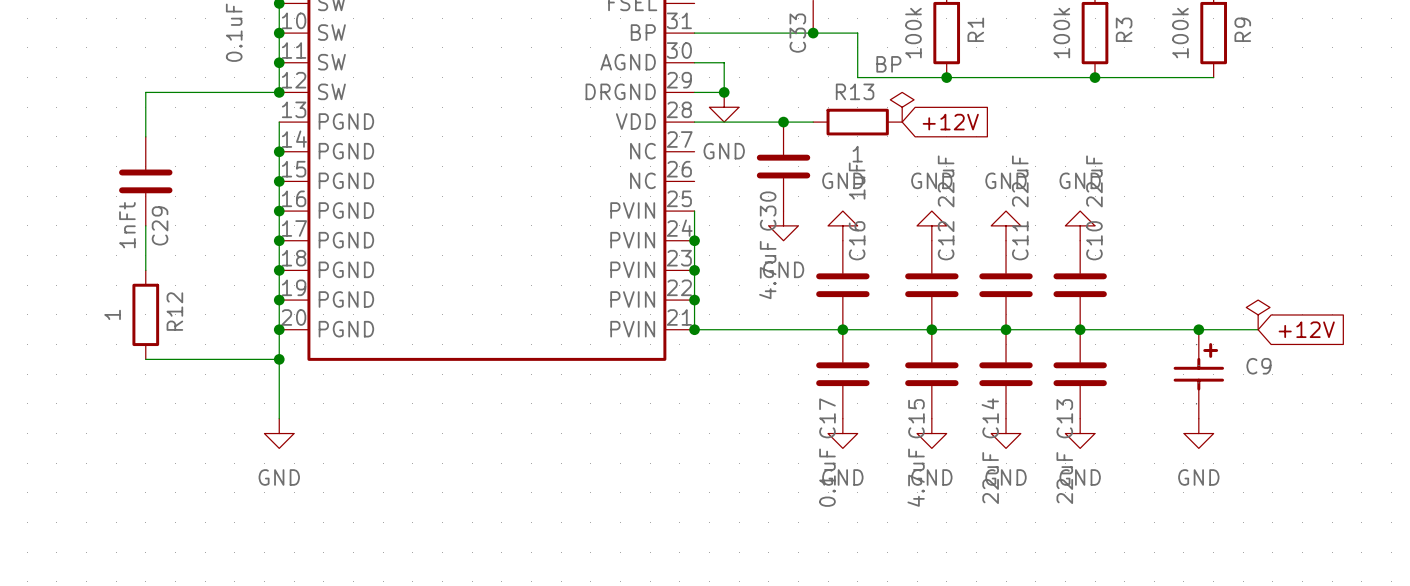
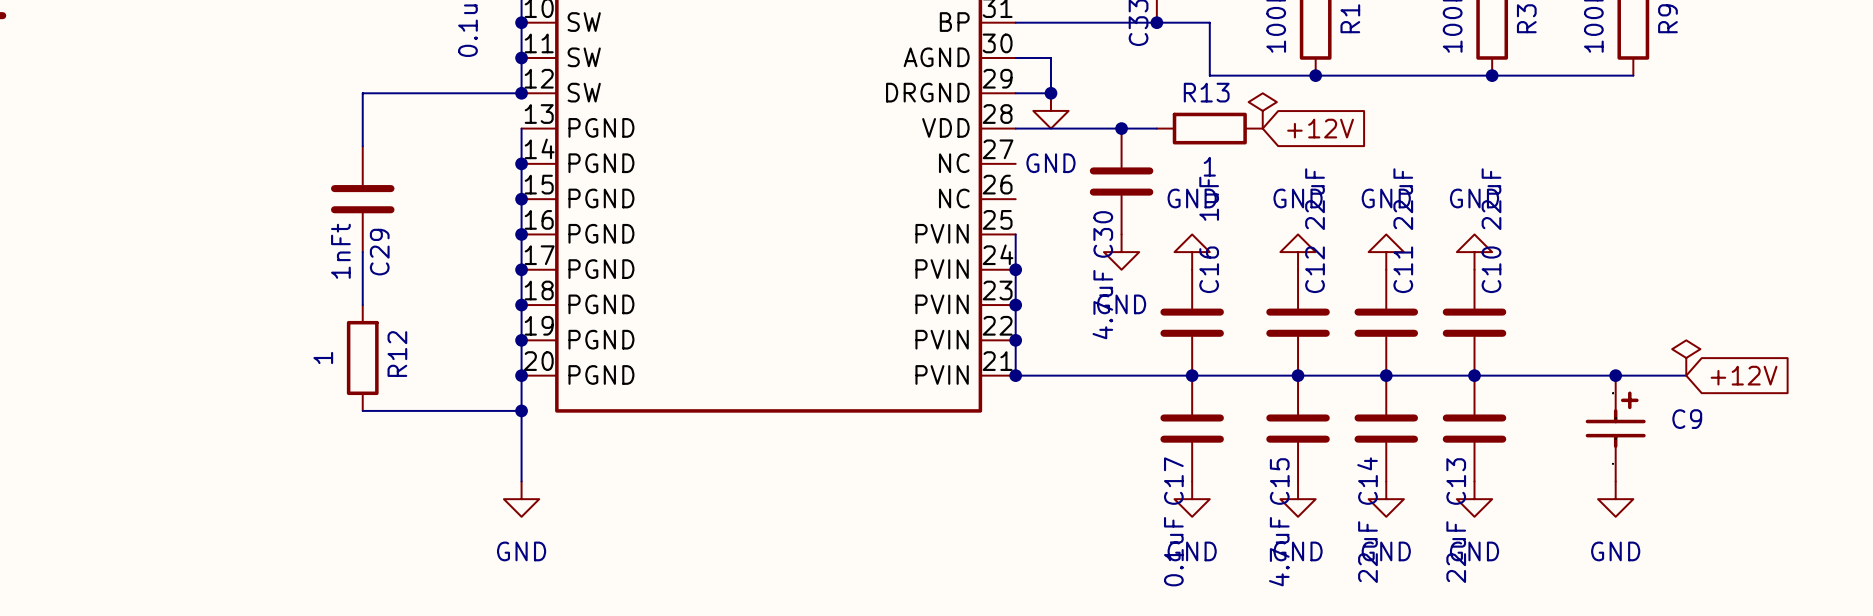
label: BP (888, 64) -> none

